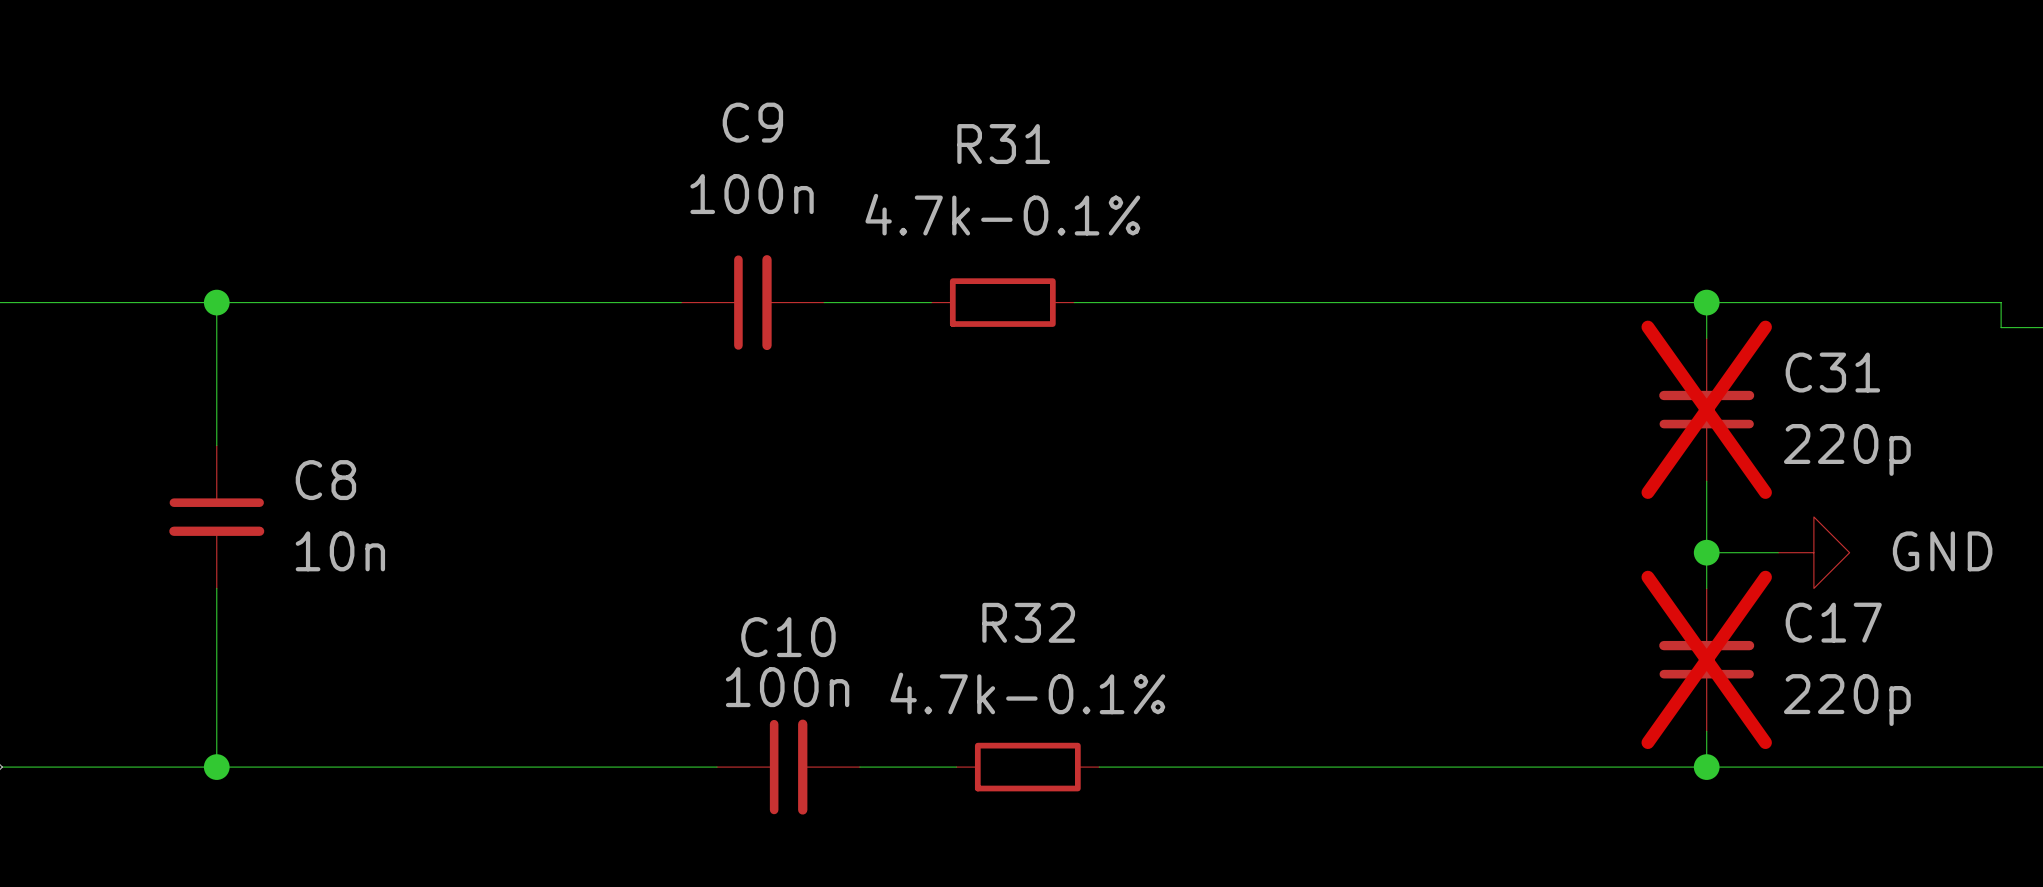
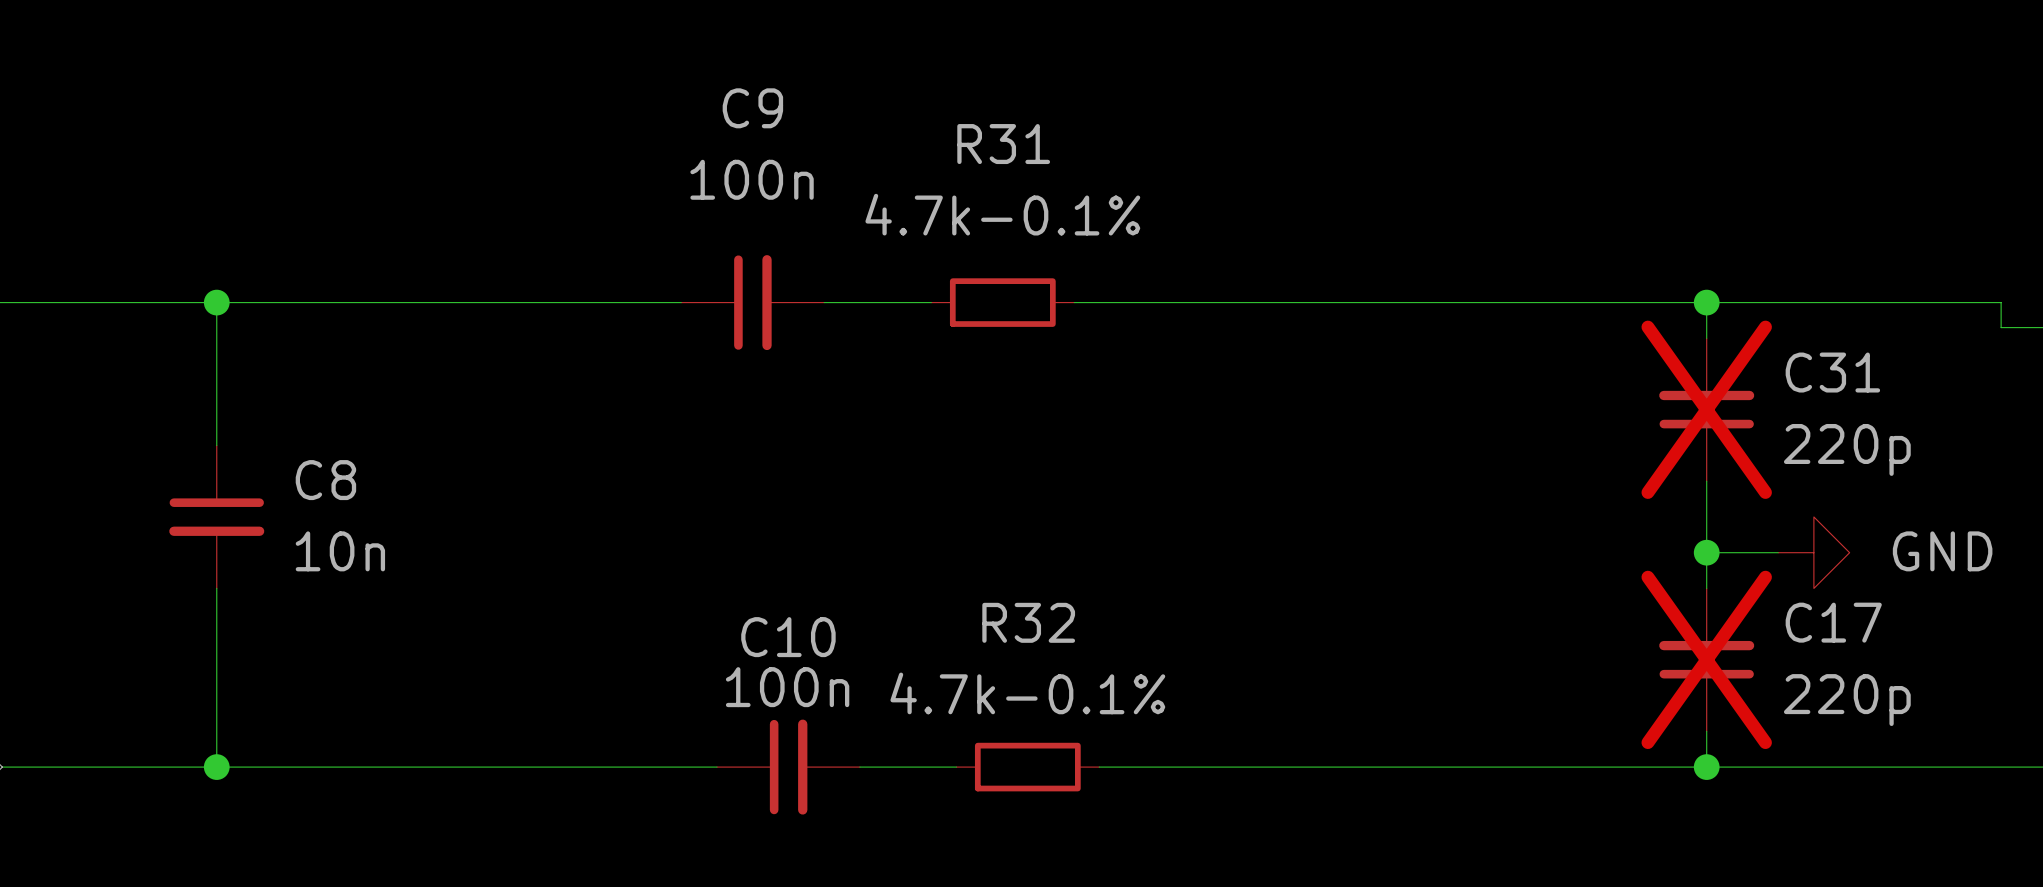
C9 name position: C9 (752, 122) -> C9 (752, 108)
C9 value position: 100n (752, 194) -> 100n (752, 179)

